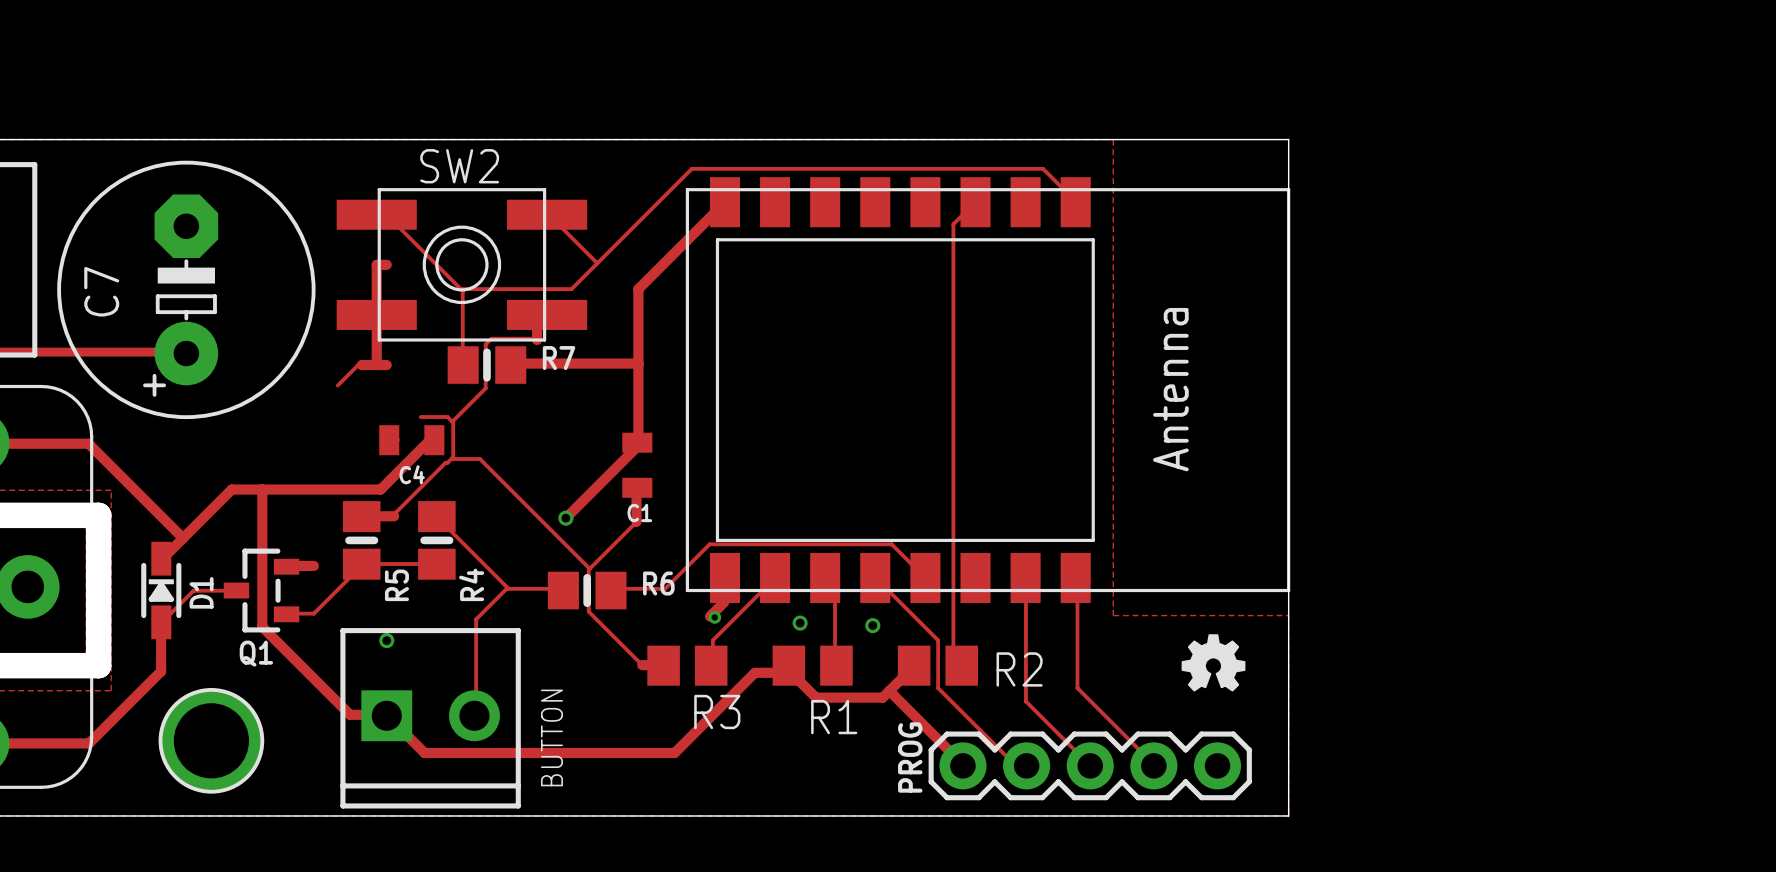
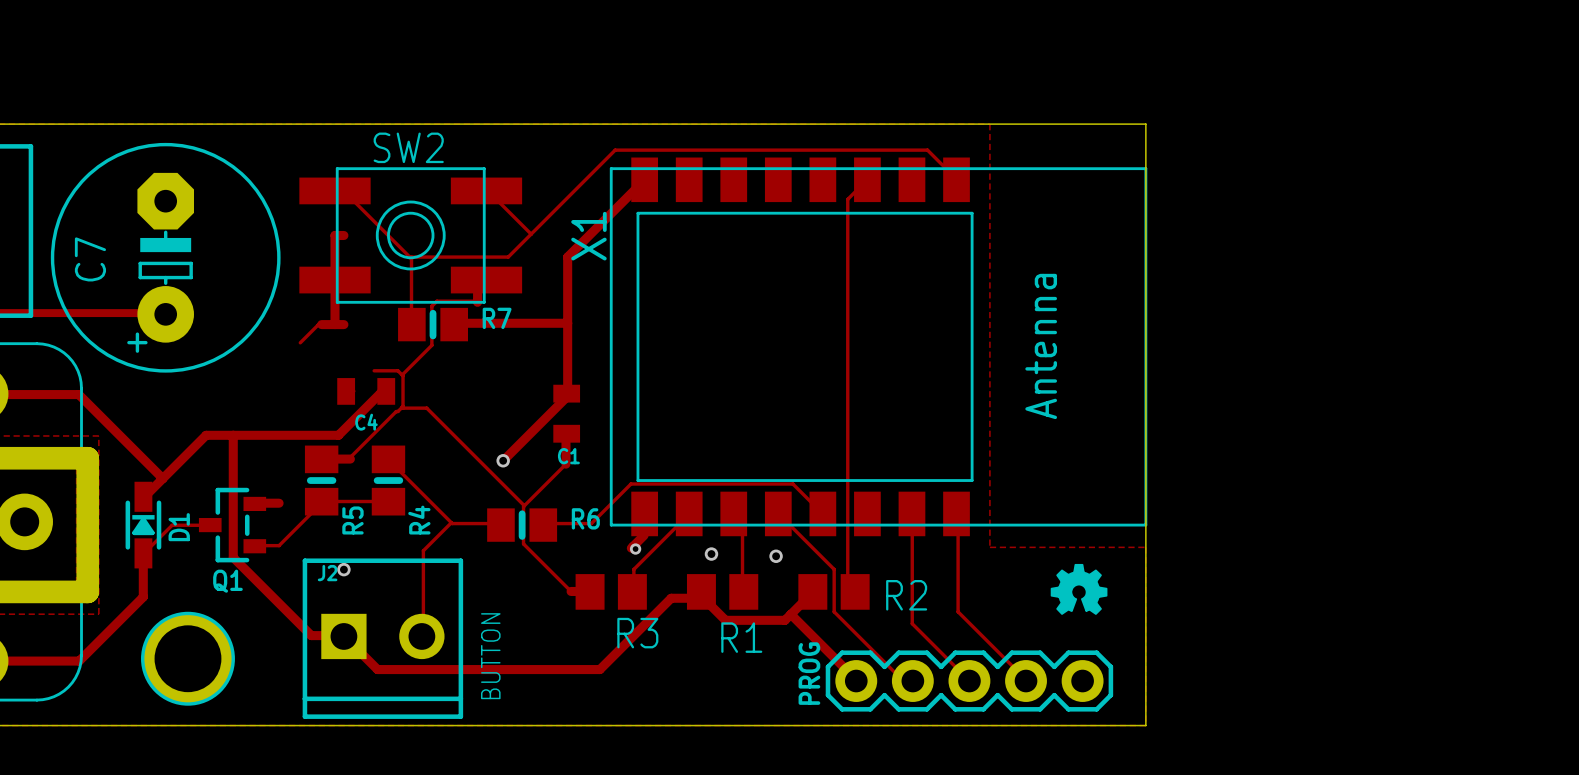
X1 name: none -> X1 (588, 236)
J2 name: none -> J2 (327, 573)

